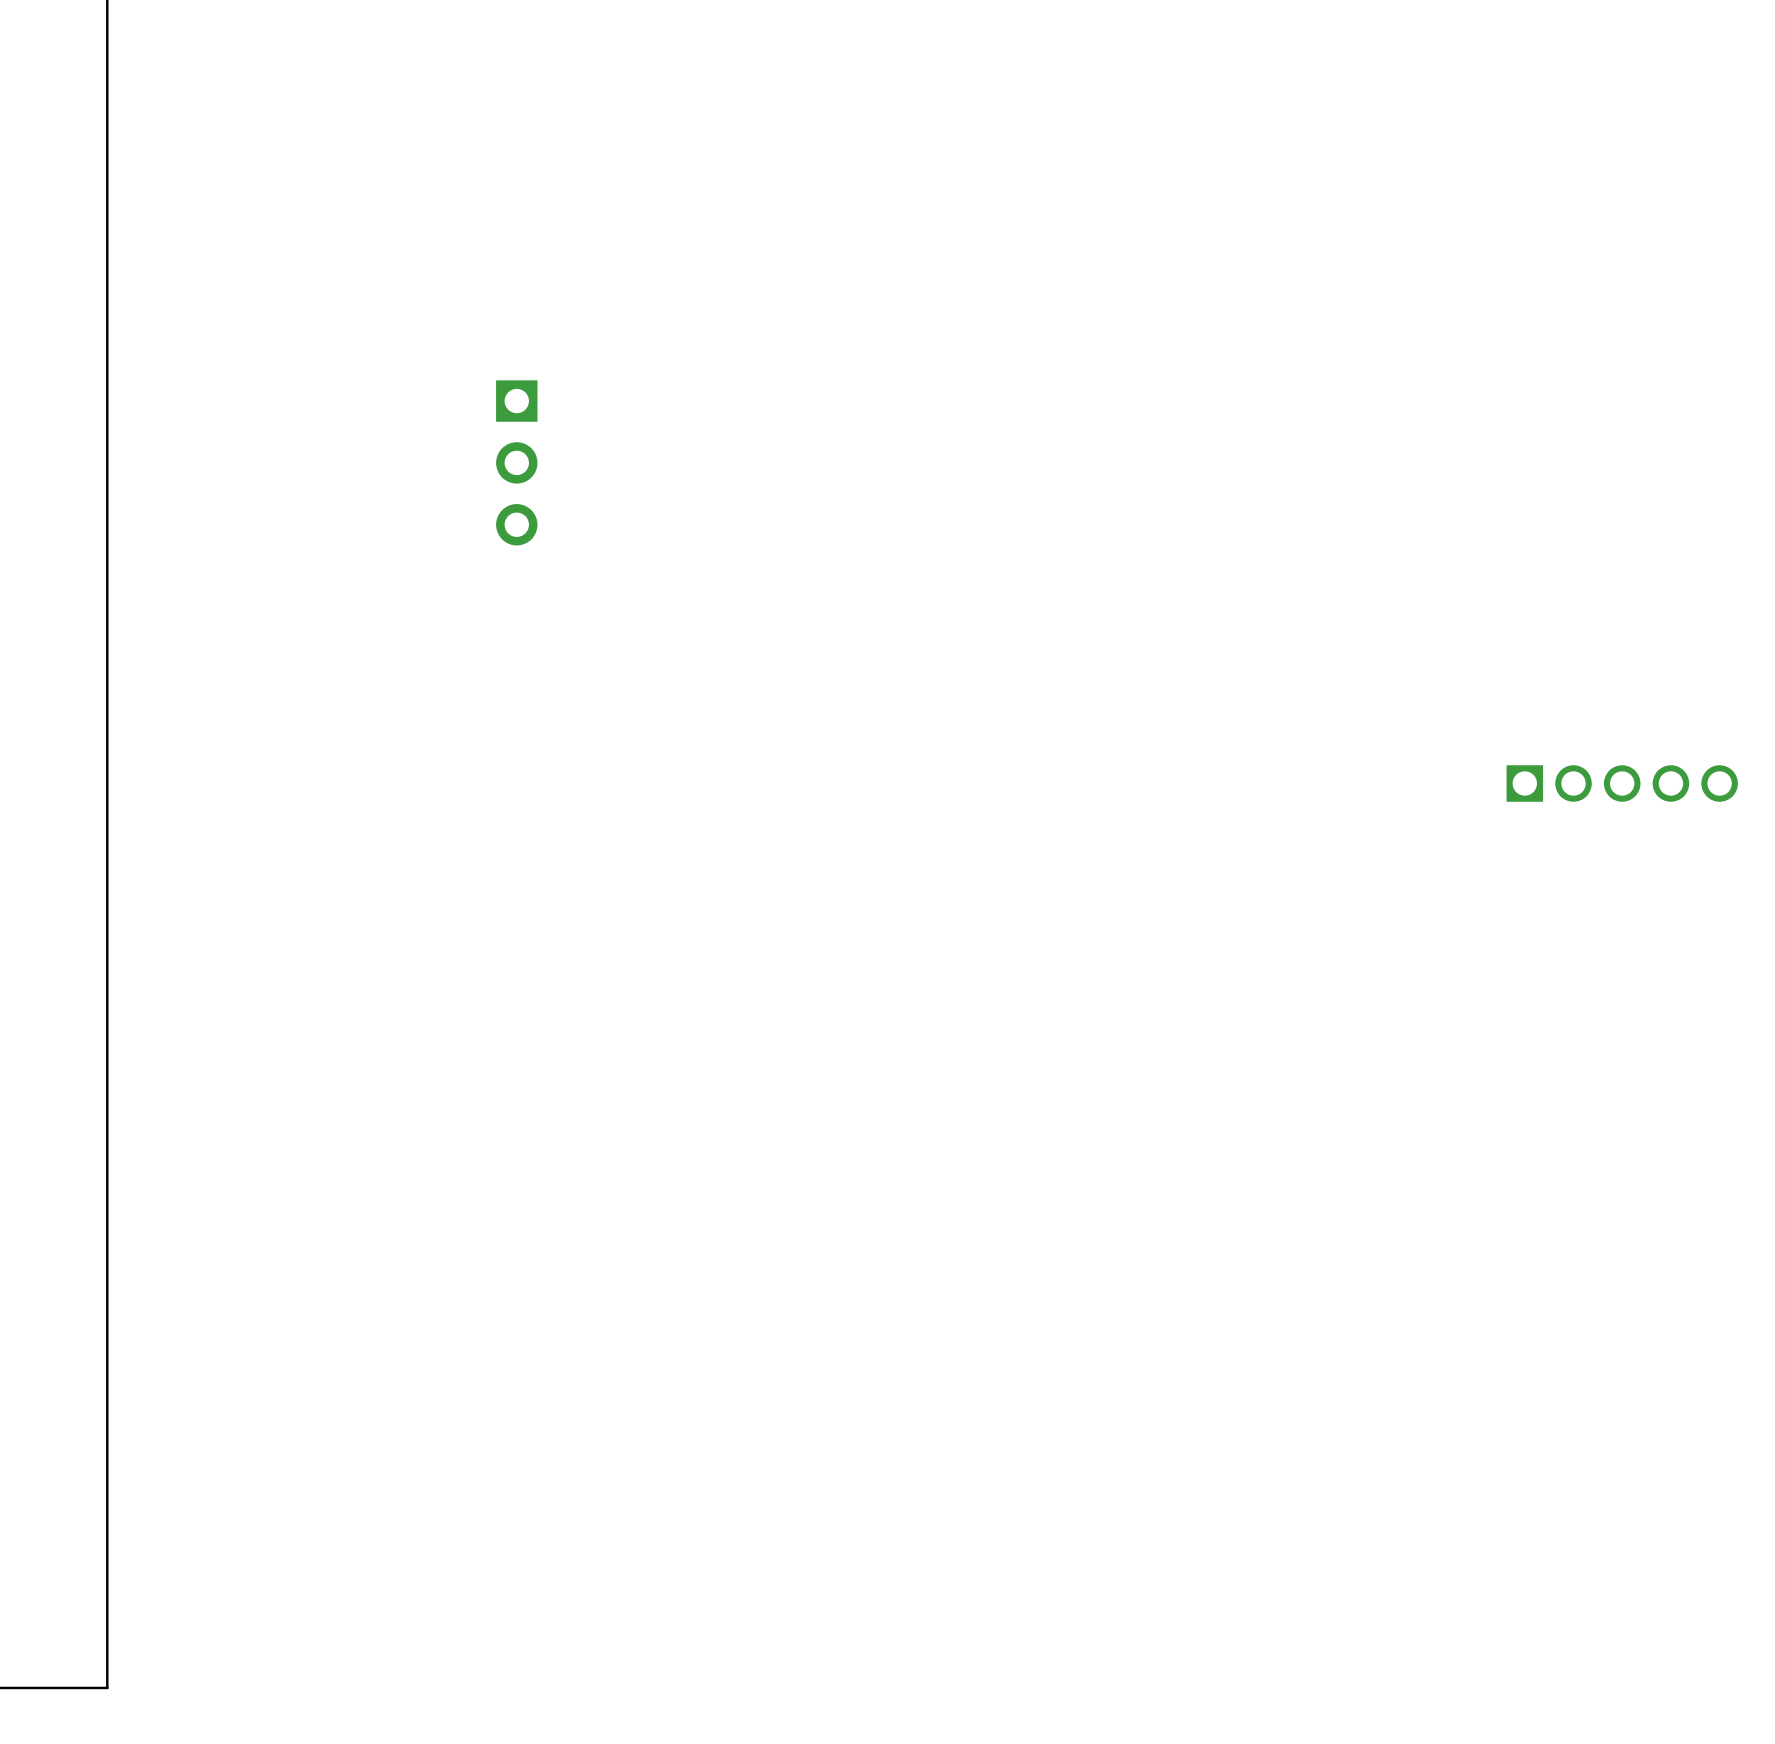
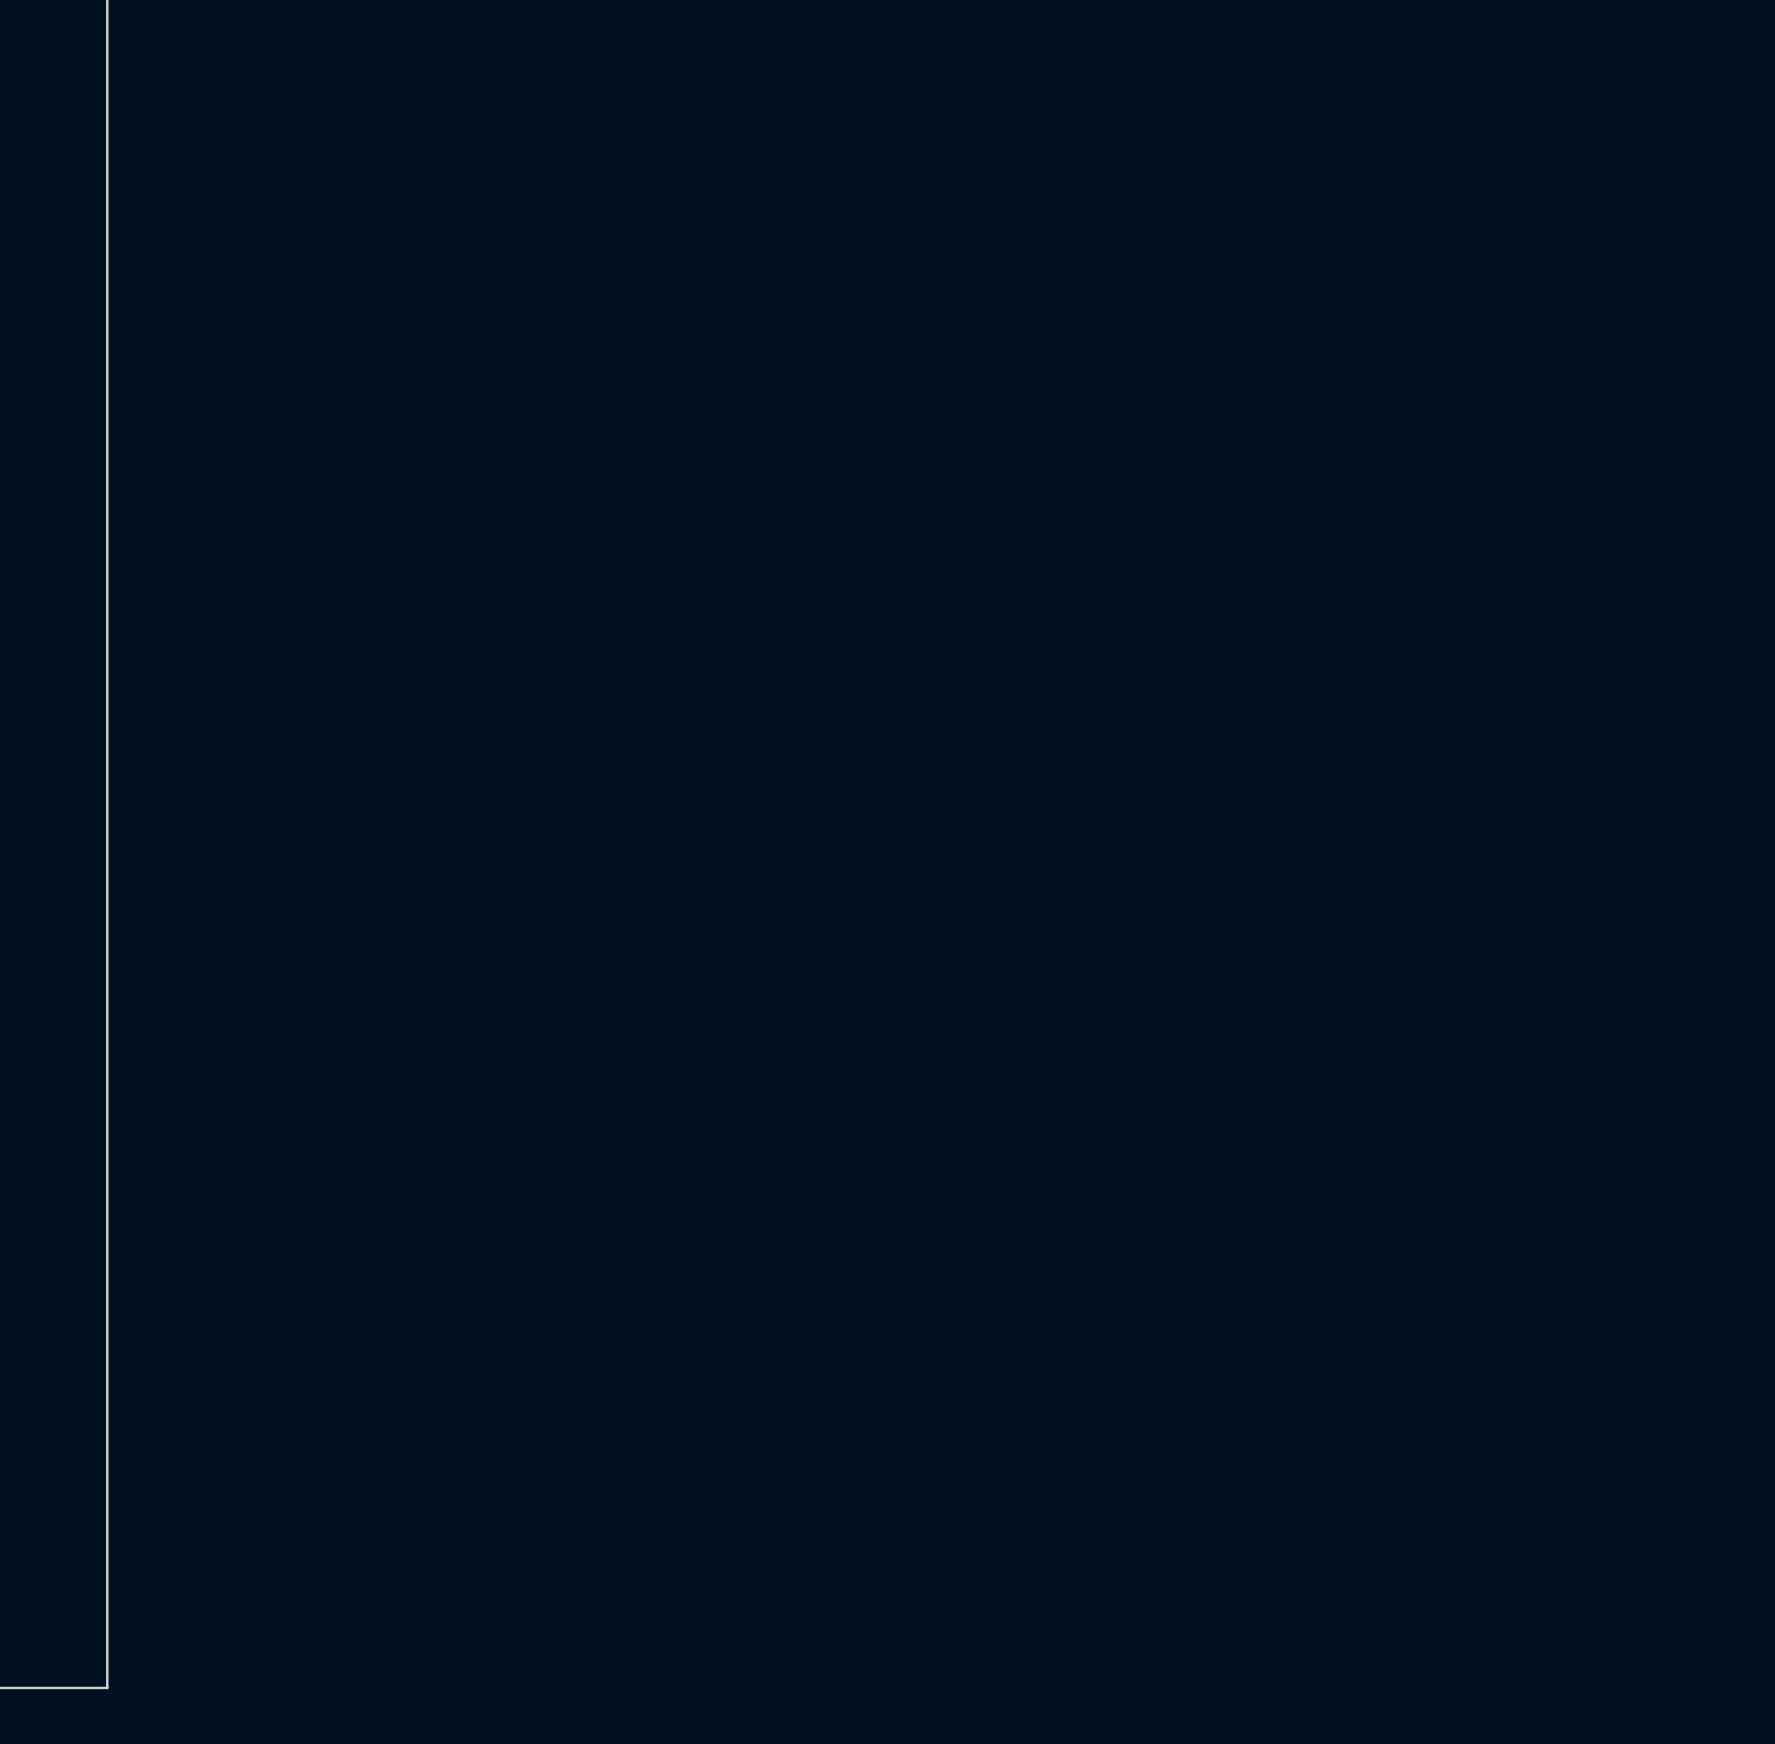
part: (516, 462) -> none
part: (1622, 783) -> none

